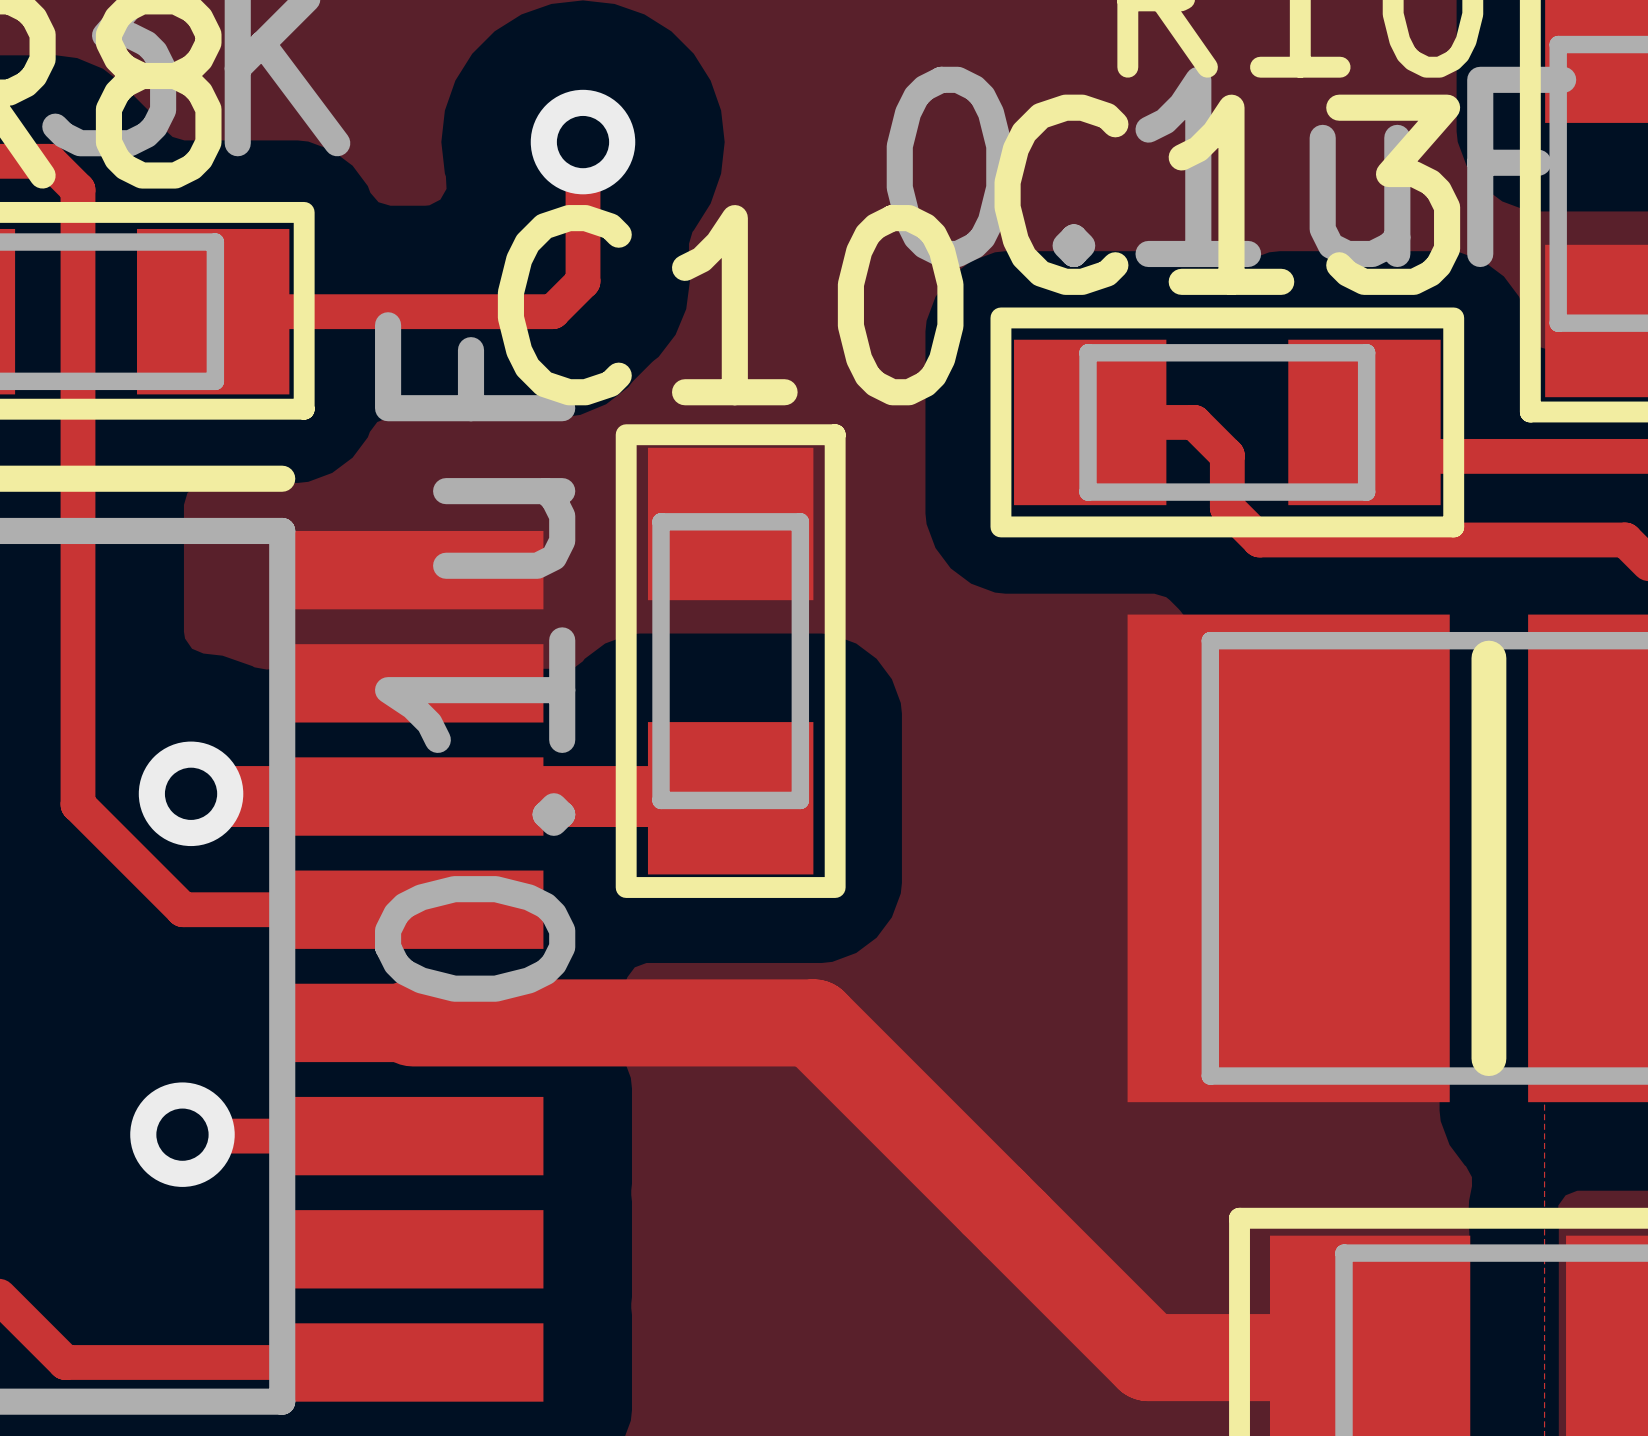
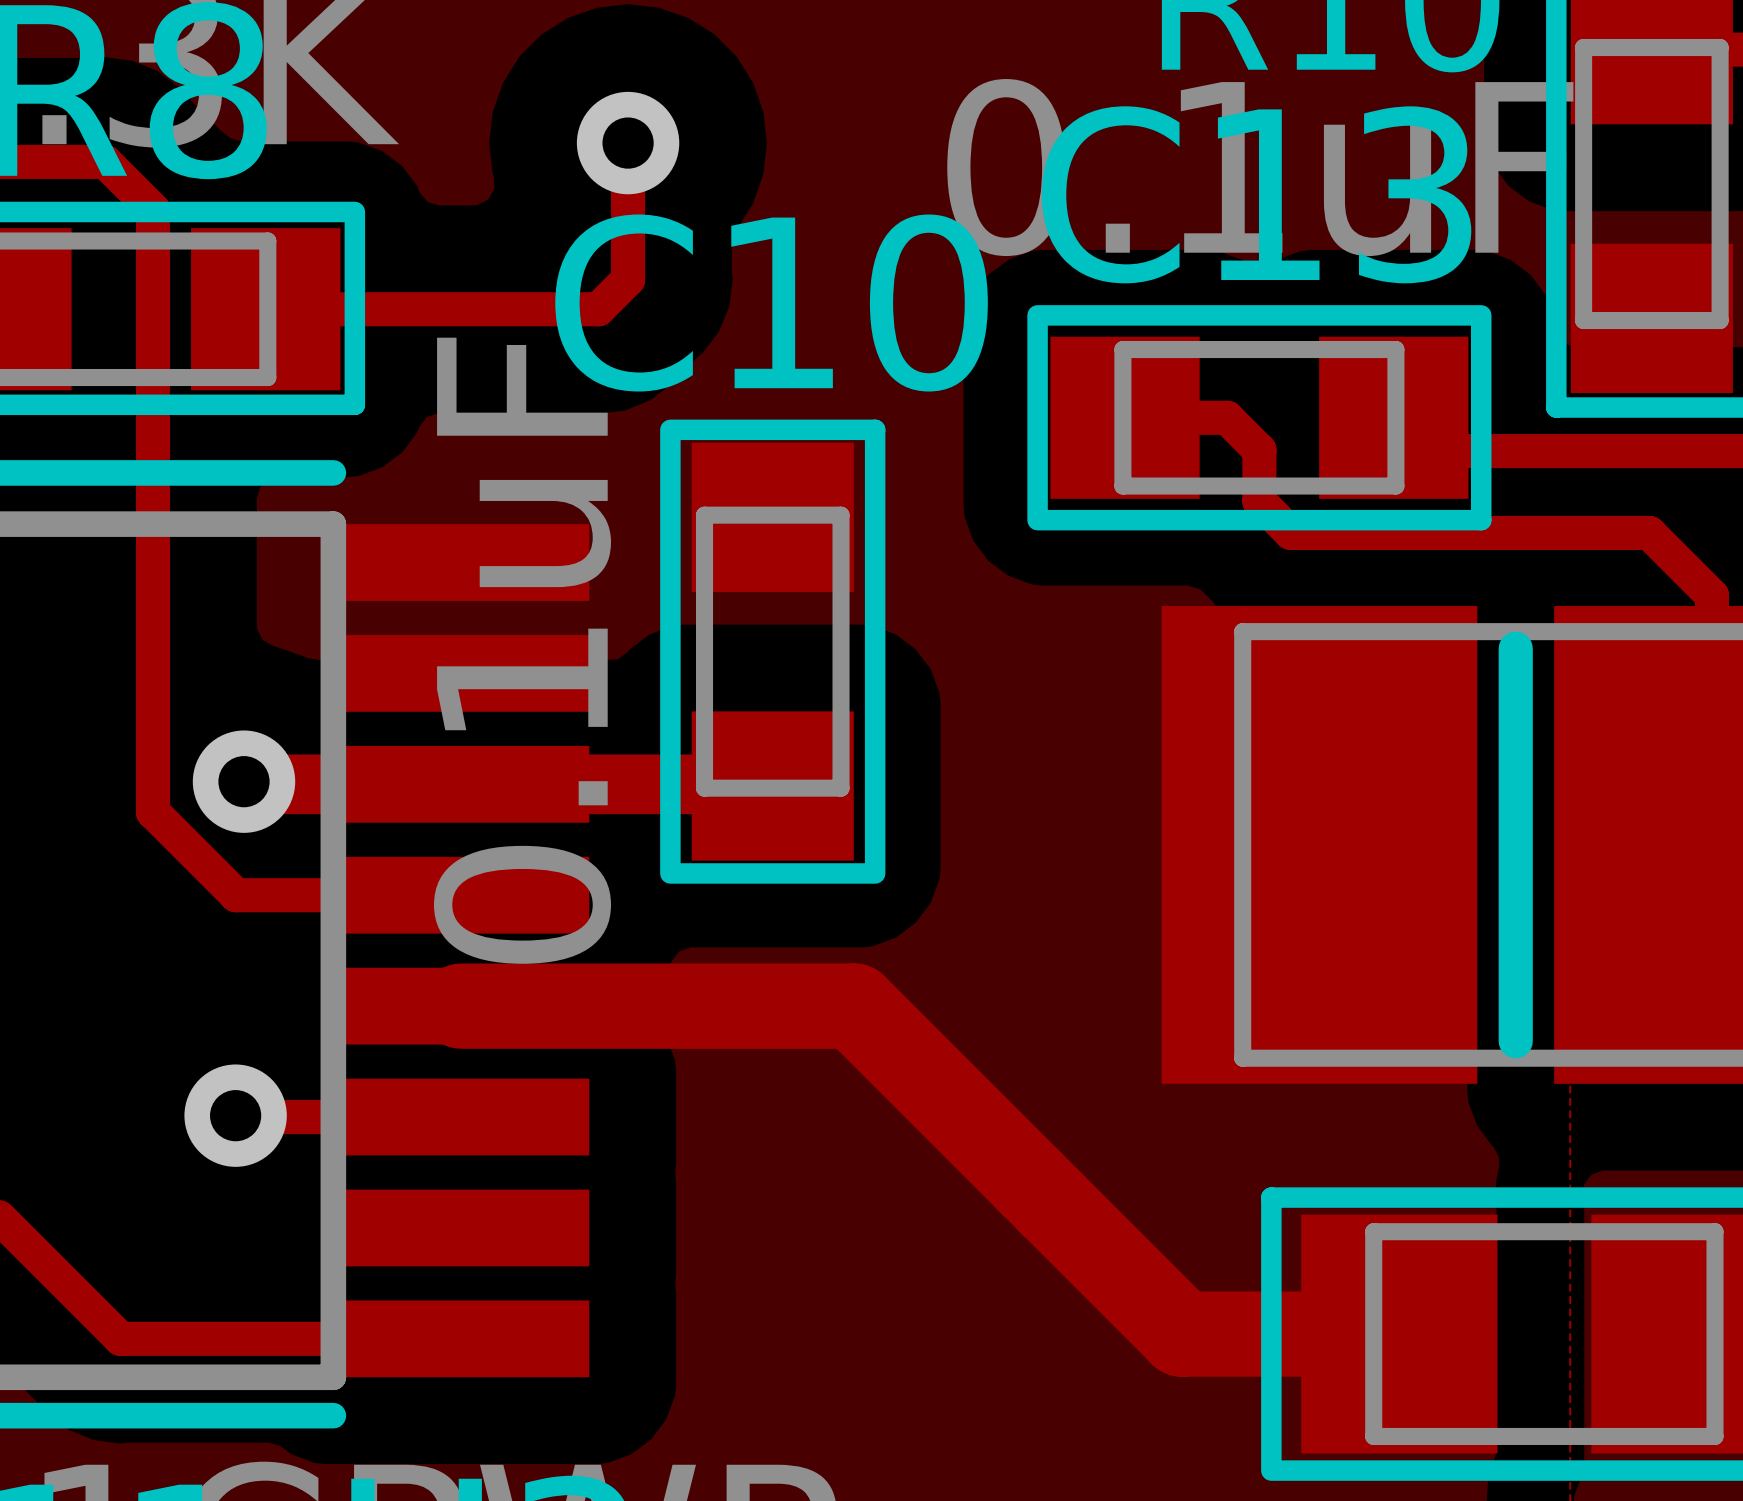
track: (77, 189) (77, 804) (98, 824) -> (133, 189) (153, 209) (153, 812)

